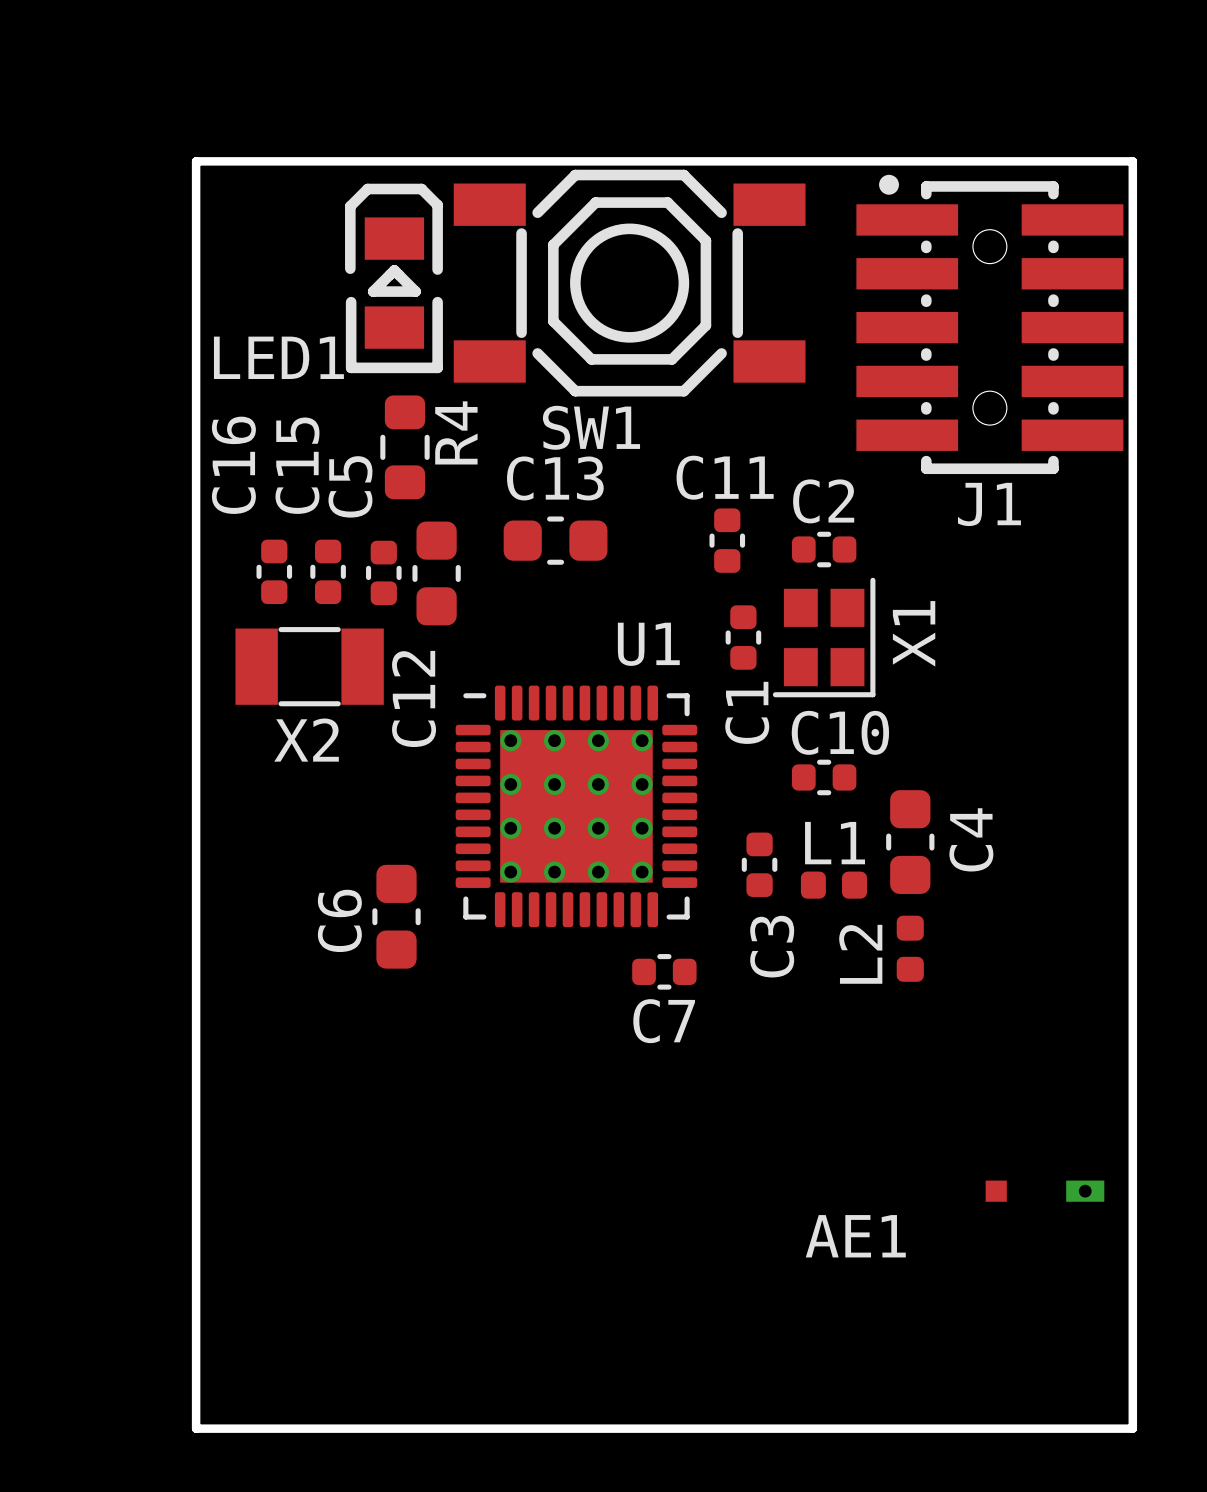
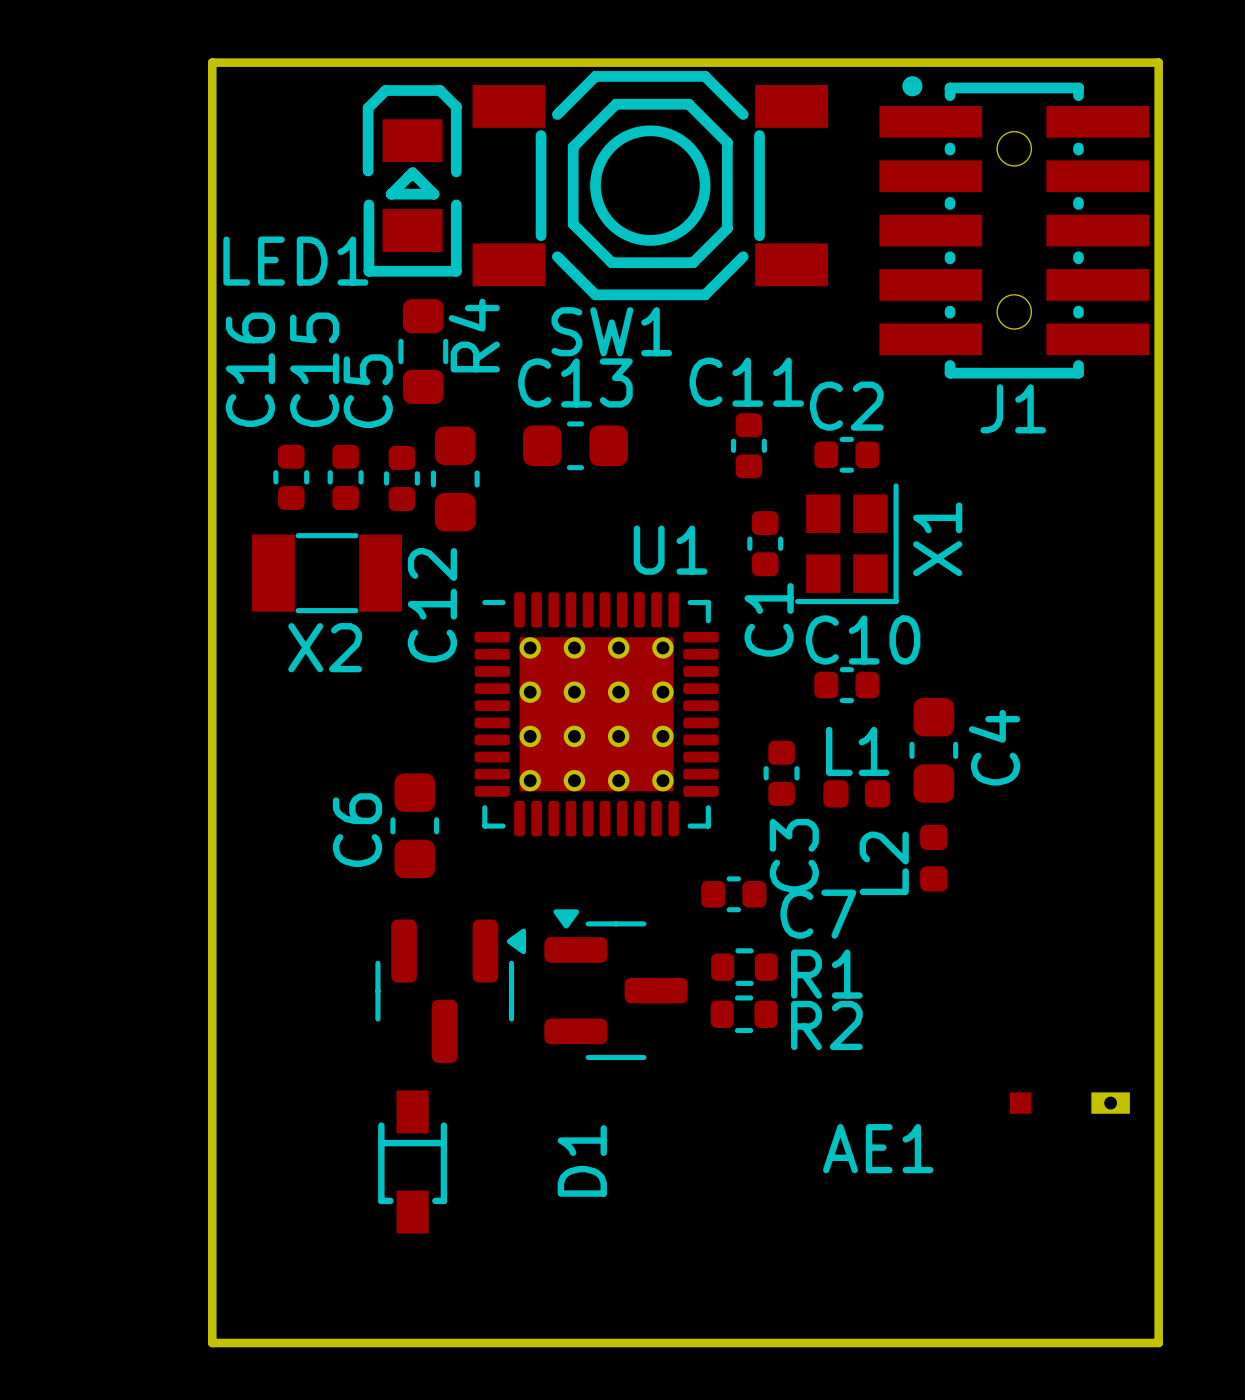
C7 position: (664, 971) -> (733, 894)
C7 name position: C7 (664, 1021) -> C7 (818, 914)
R1: none -> (744, 967)
part: none -> (616, 984)
part: none -> (450, 991)
R2: none -> (744, 1014)
D1: none -> (412, 1161)

